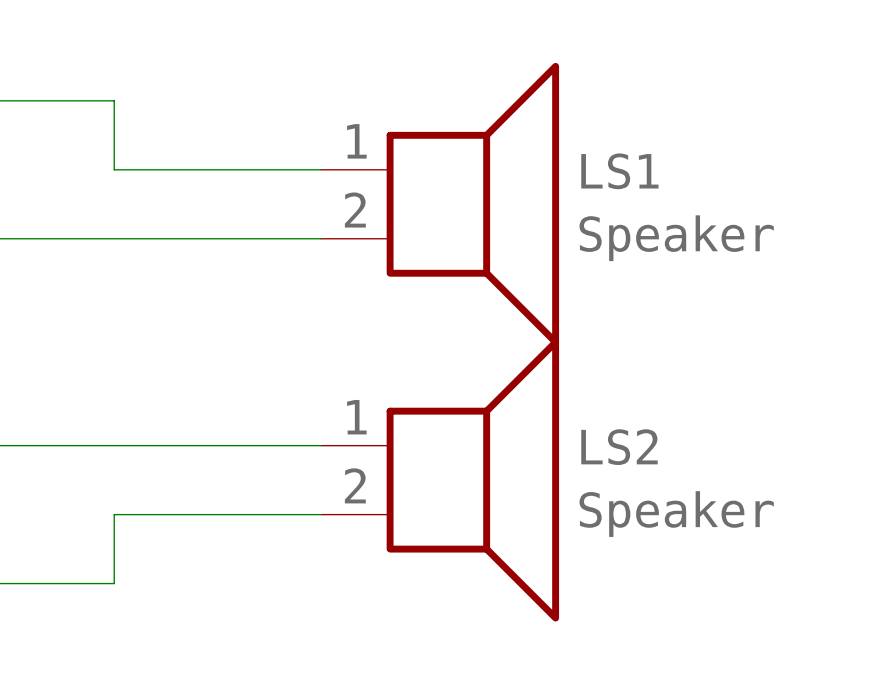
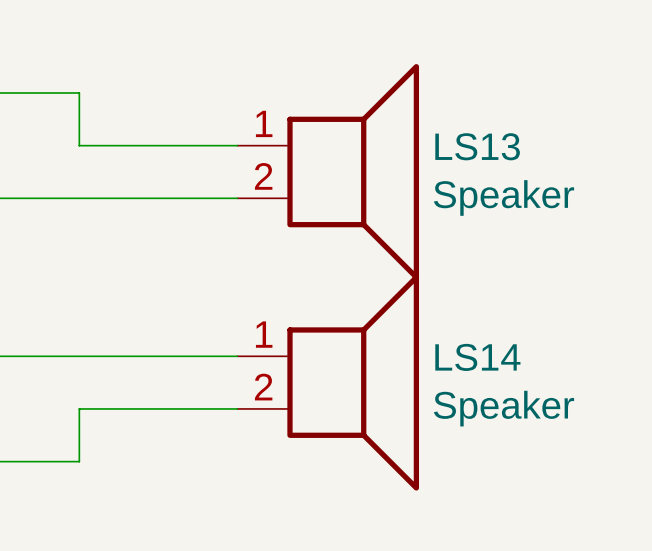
LS1 name: LS1 (619, 171) -> LS13 (477, 146)
LS2 name: LS2 (619, 447) -> LS14 (477, 357)

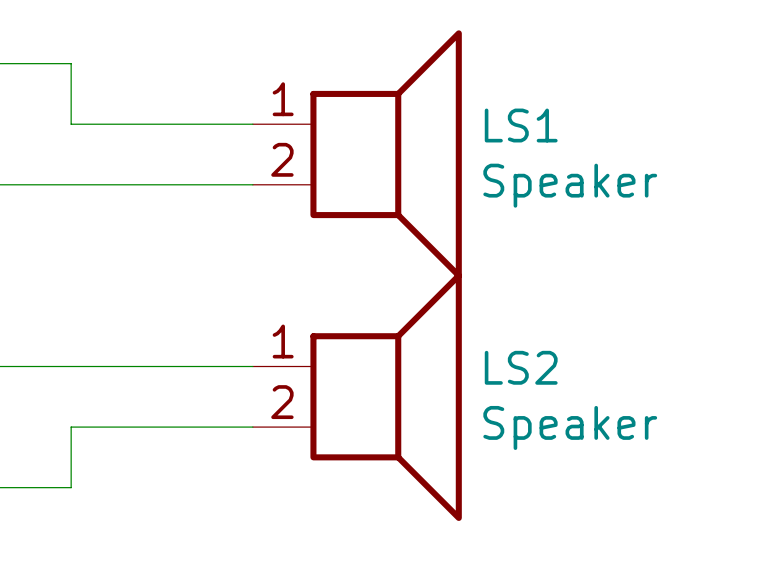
LS13 name: LS13 (477, 146) -> LS1 (521, 125)
LS14 name: LS14 (477, 357) -> LS2 (521, 367)

